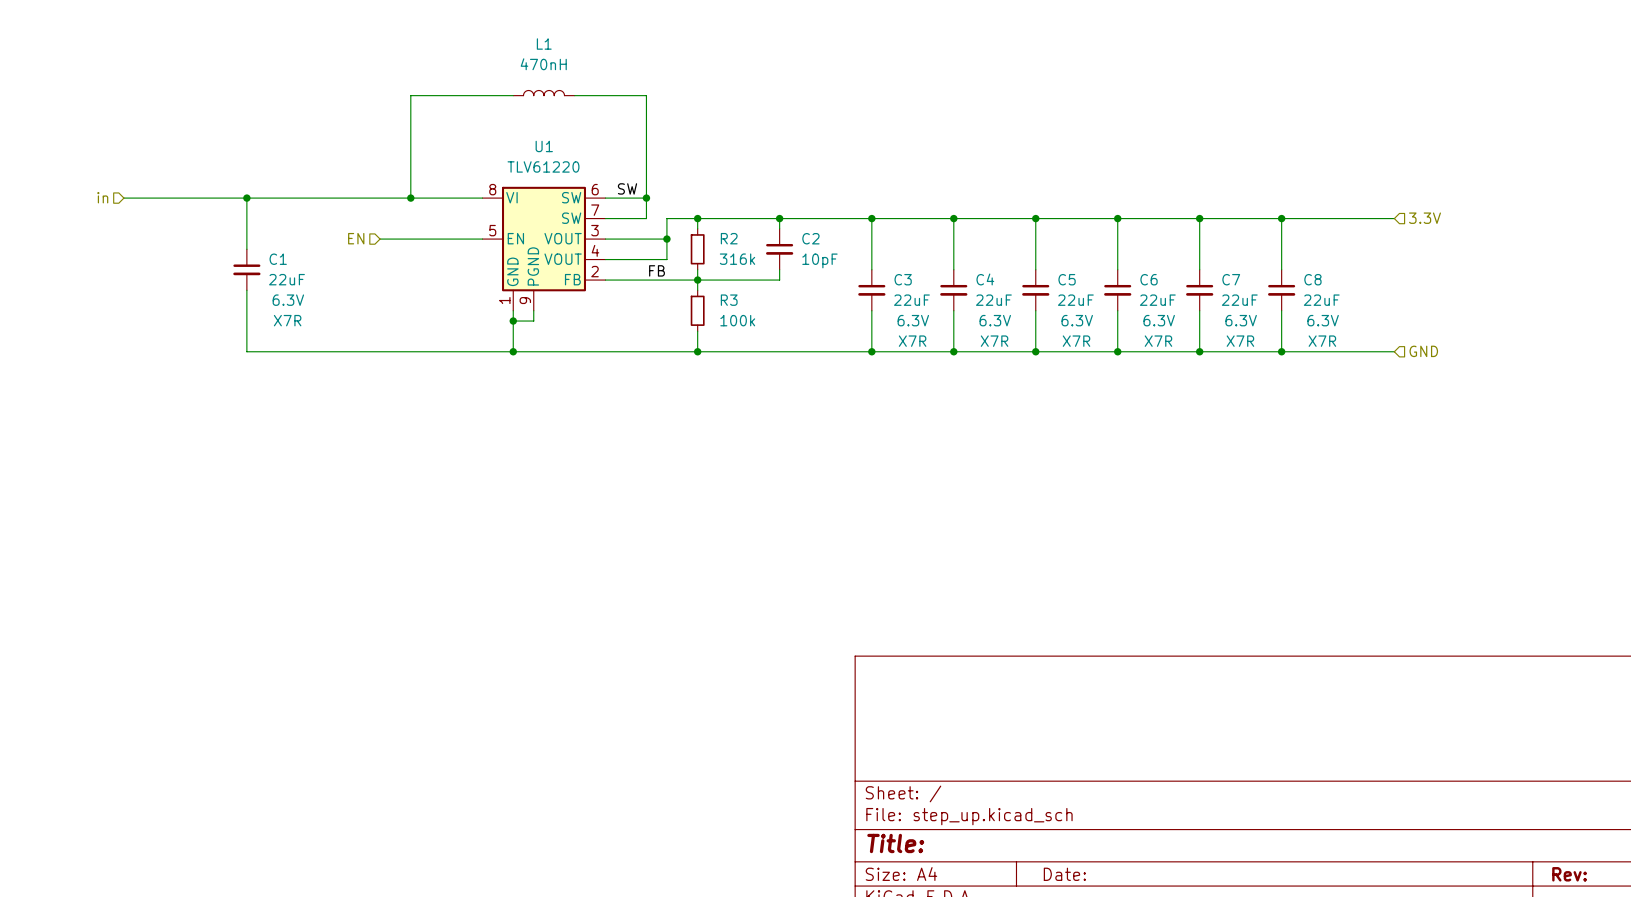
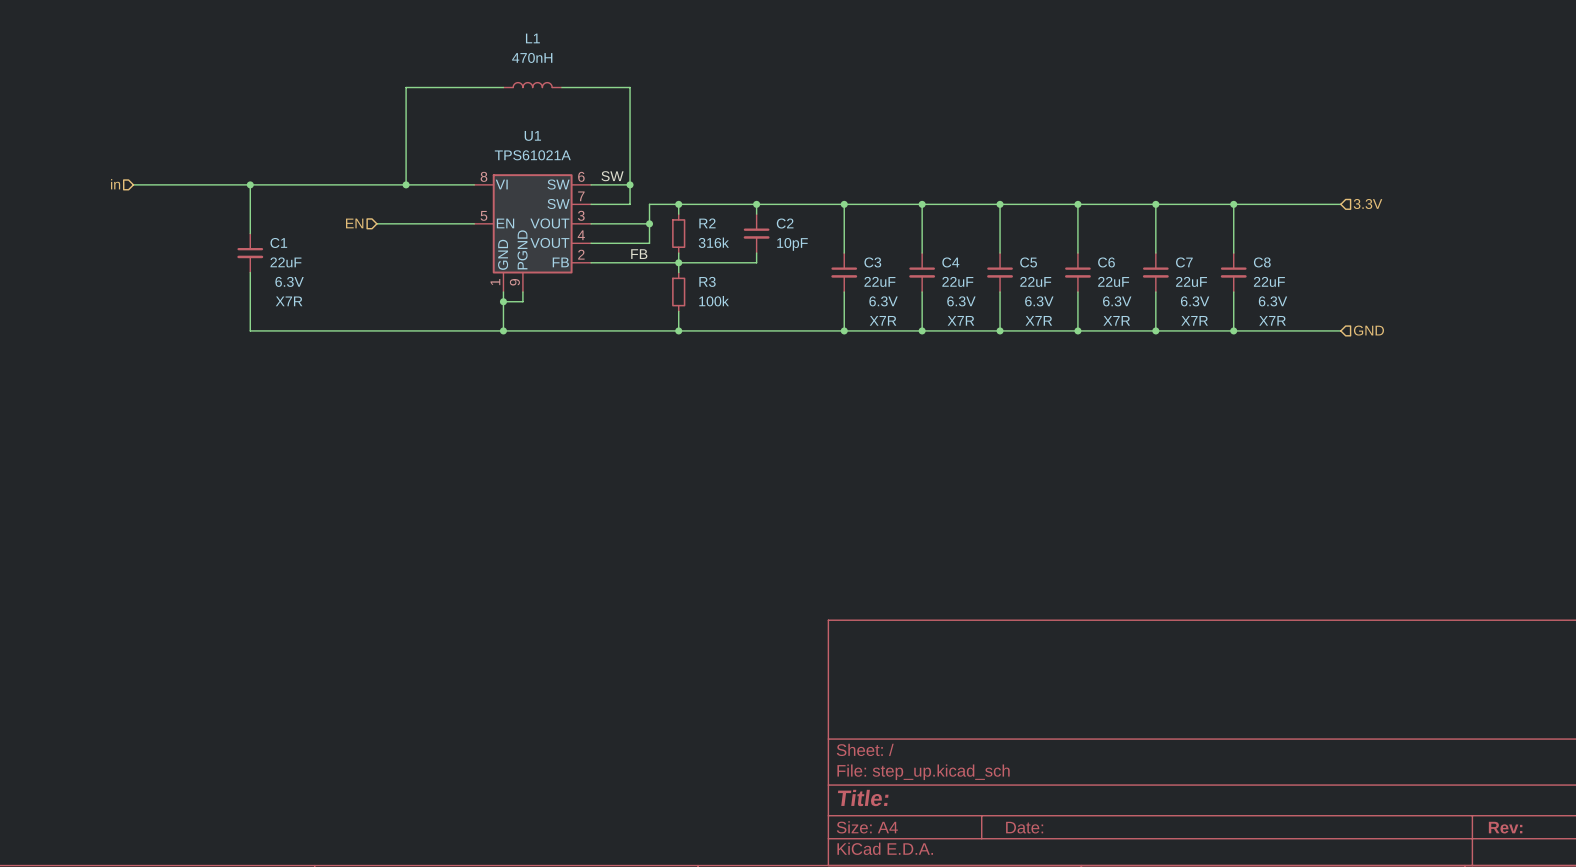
U1 value: TLV61220 (543, 166) -> TPS61021A (532, 155)

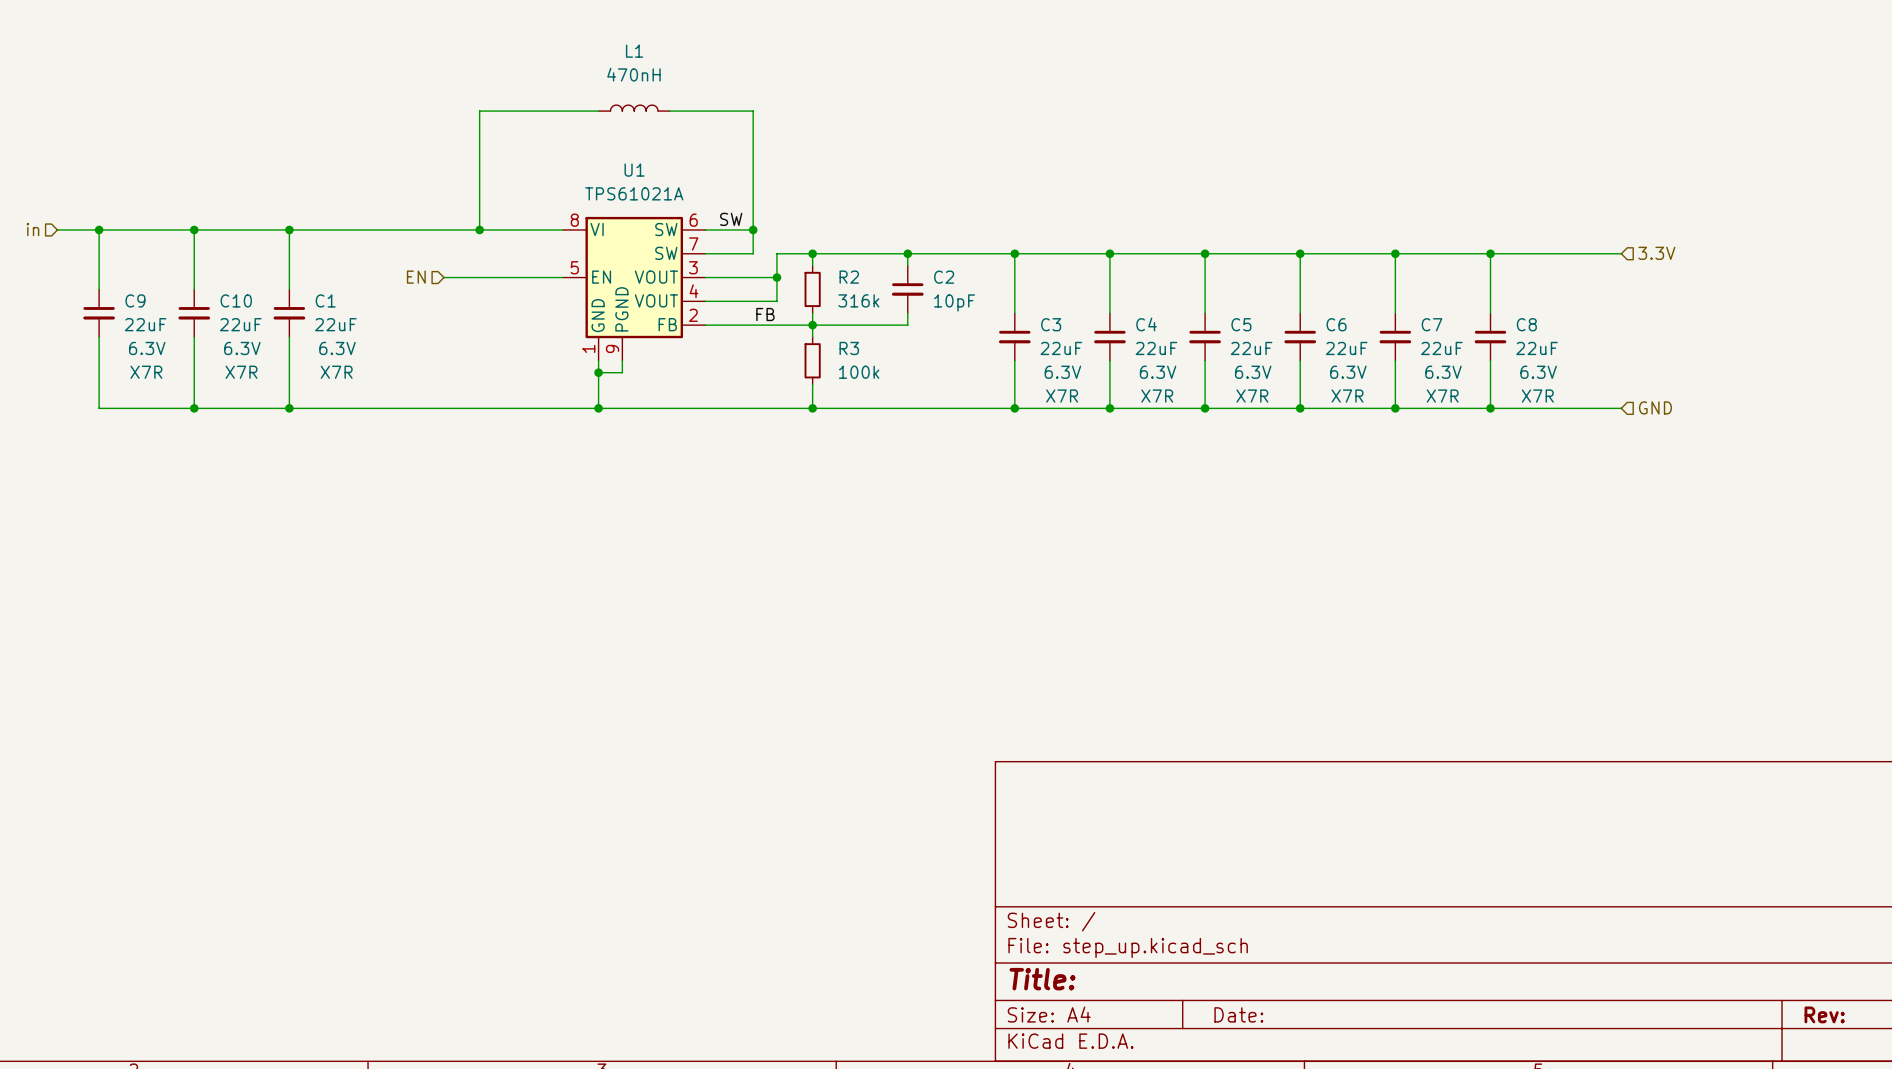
wire: none -> (57, 229) (146, 229)
wire: none -> (99, 229) (99, 289)
junction: none -> (99, 229)
hierarchical label position: in (115, 184) -> in (32, 229)
wire: none -> (194, 229) (194, 289)
junction: none -> (194, 229)
C9: none -> 22uF (99, 313)
C10: none -> 22uF (194, 313)
wire: none -> (99, 337) (99, 408) (289, 408)
wire: none -> (194, 337) (194, 408)
junction: none -> (194, 408)
junction: none -> (289, 408)

